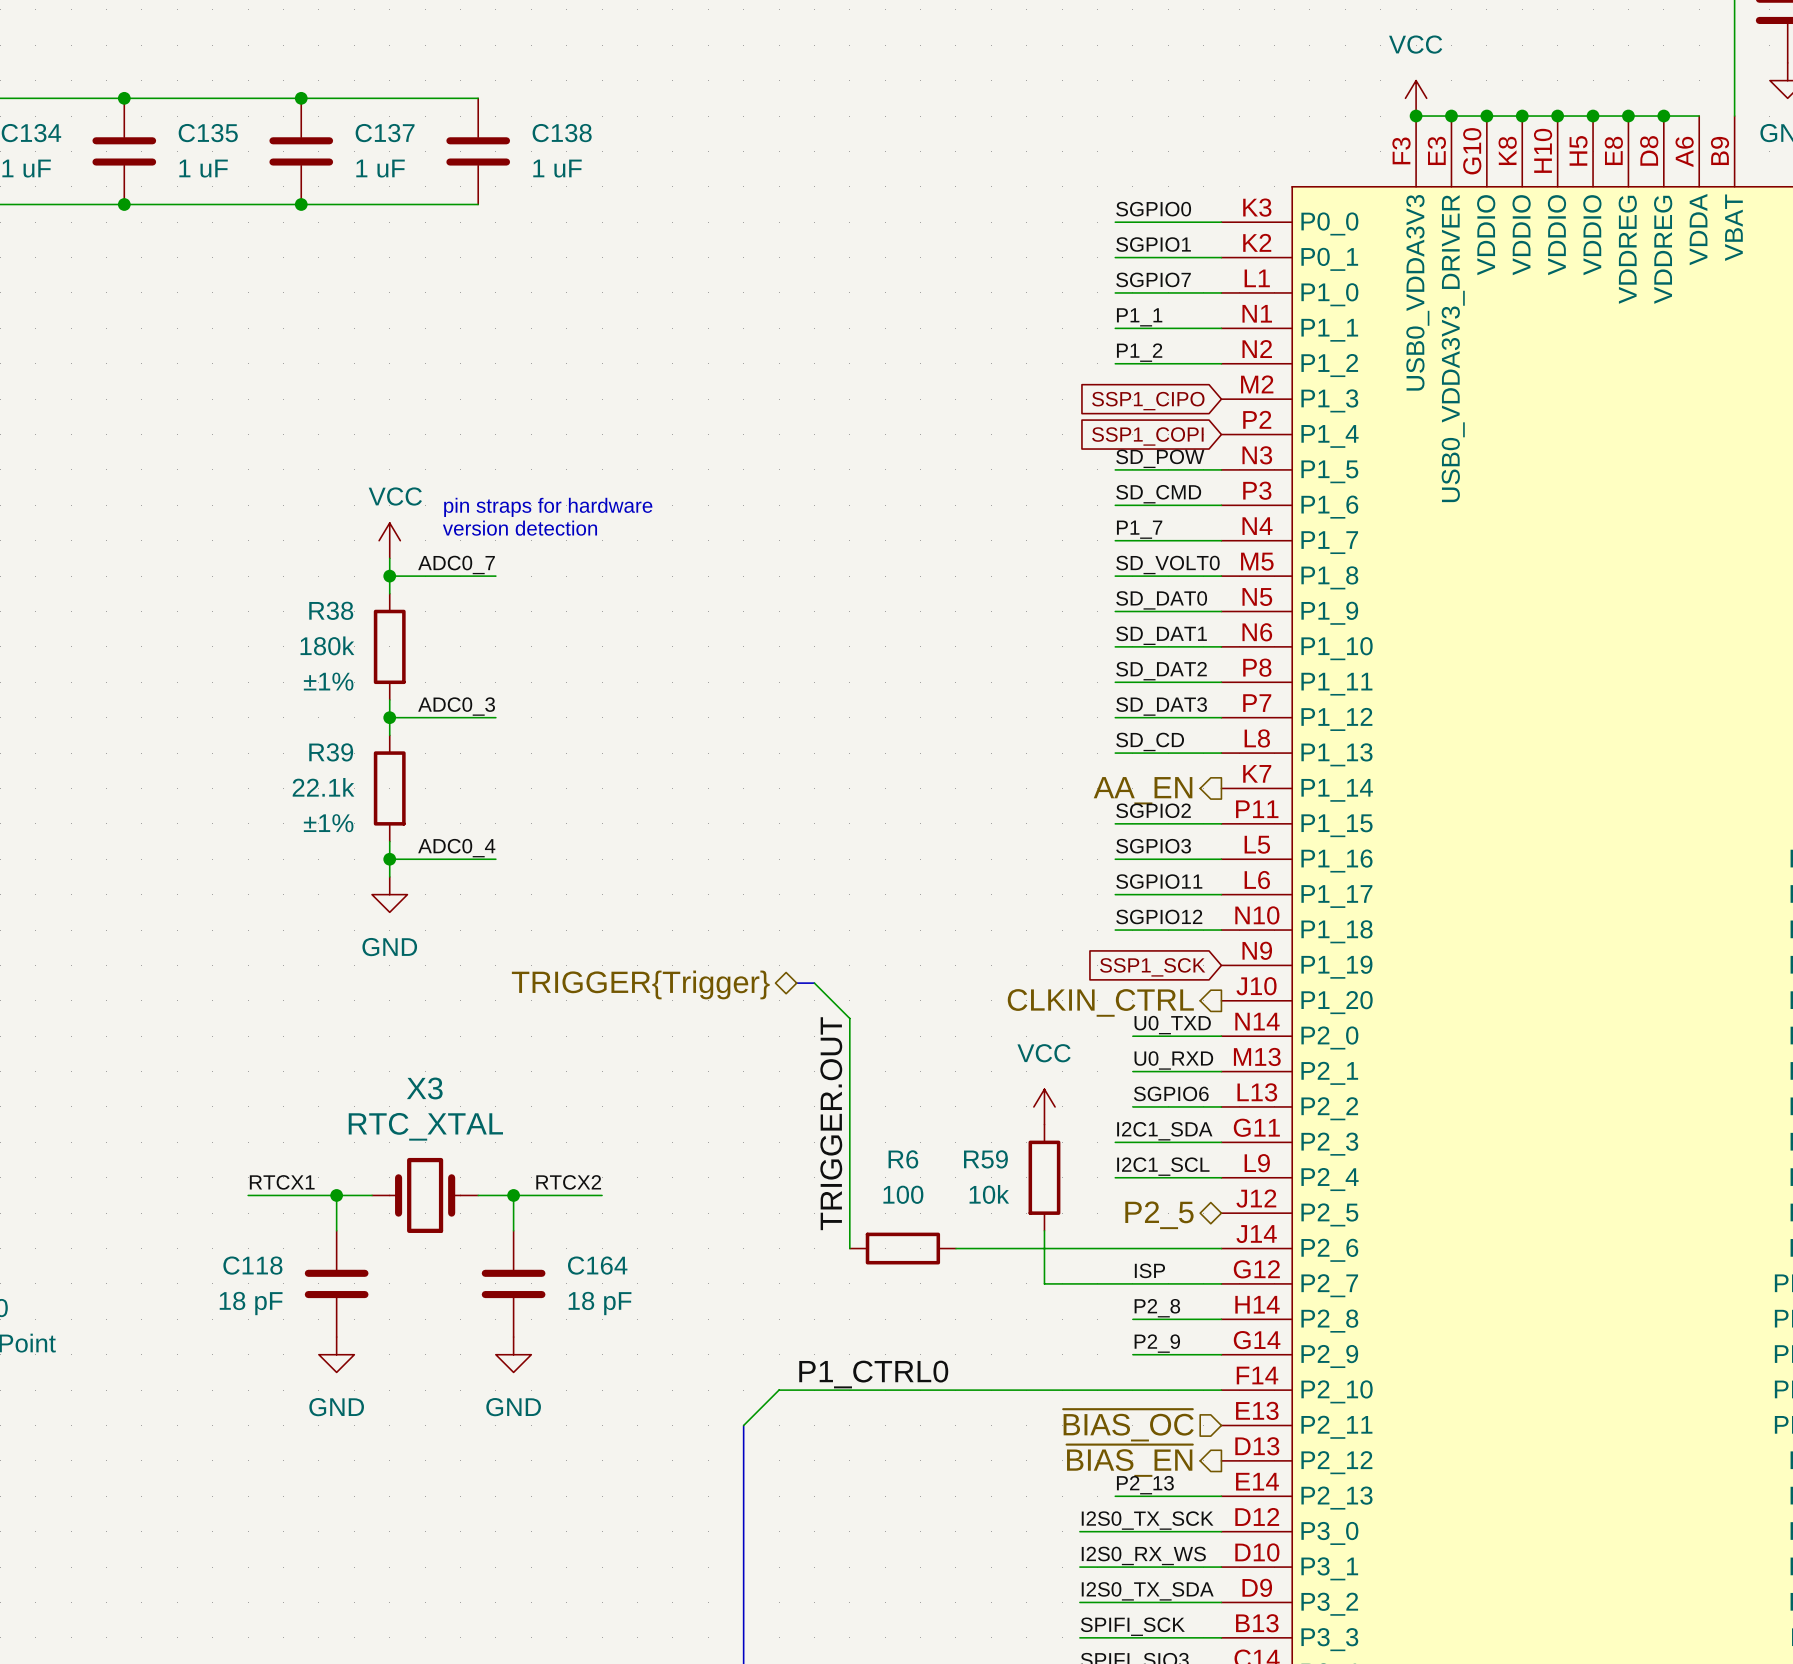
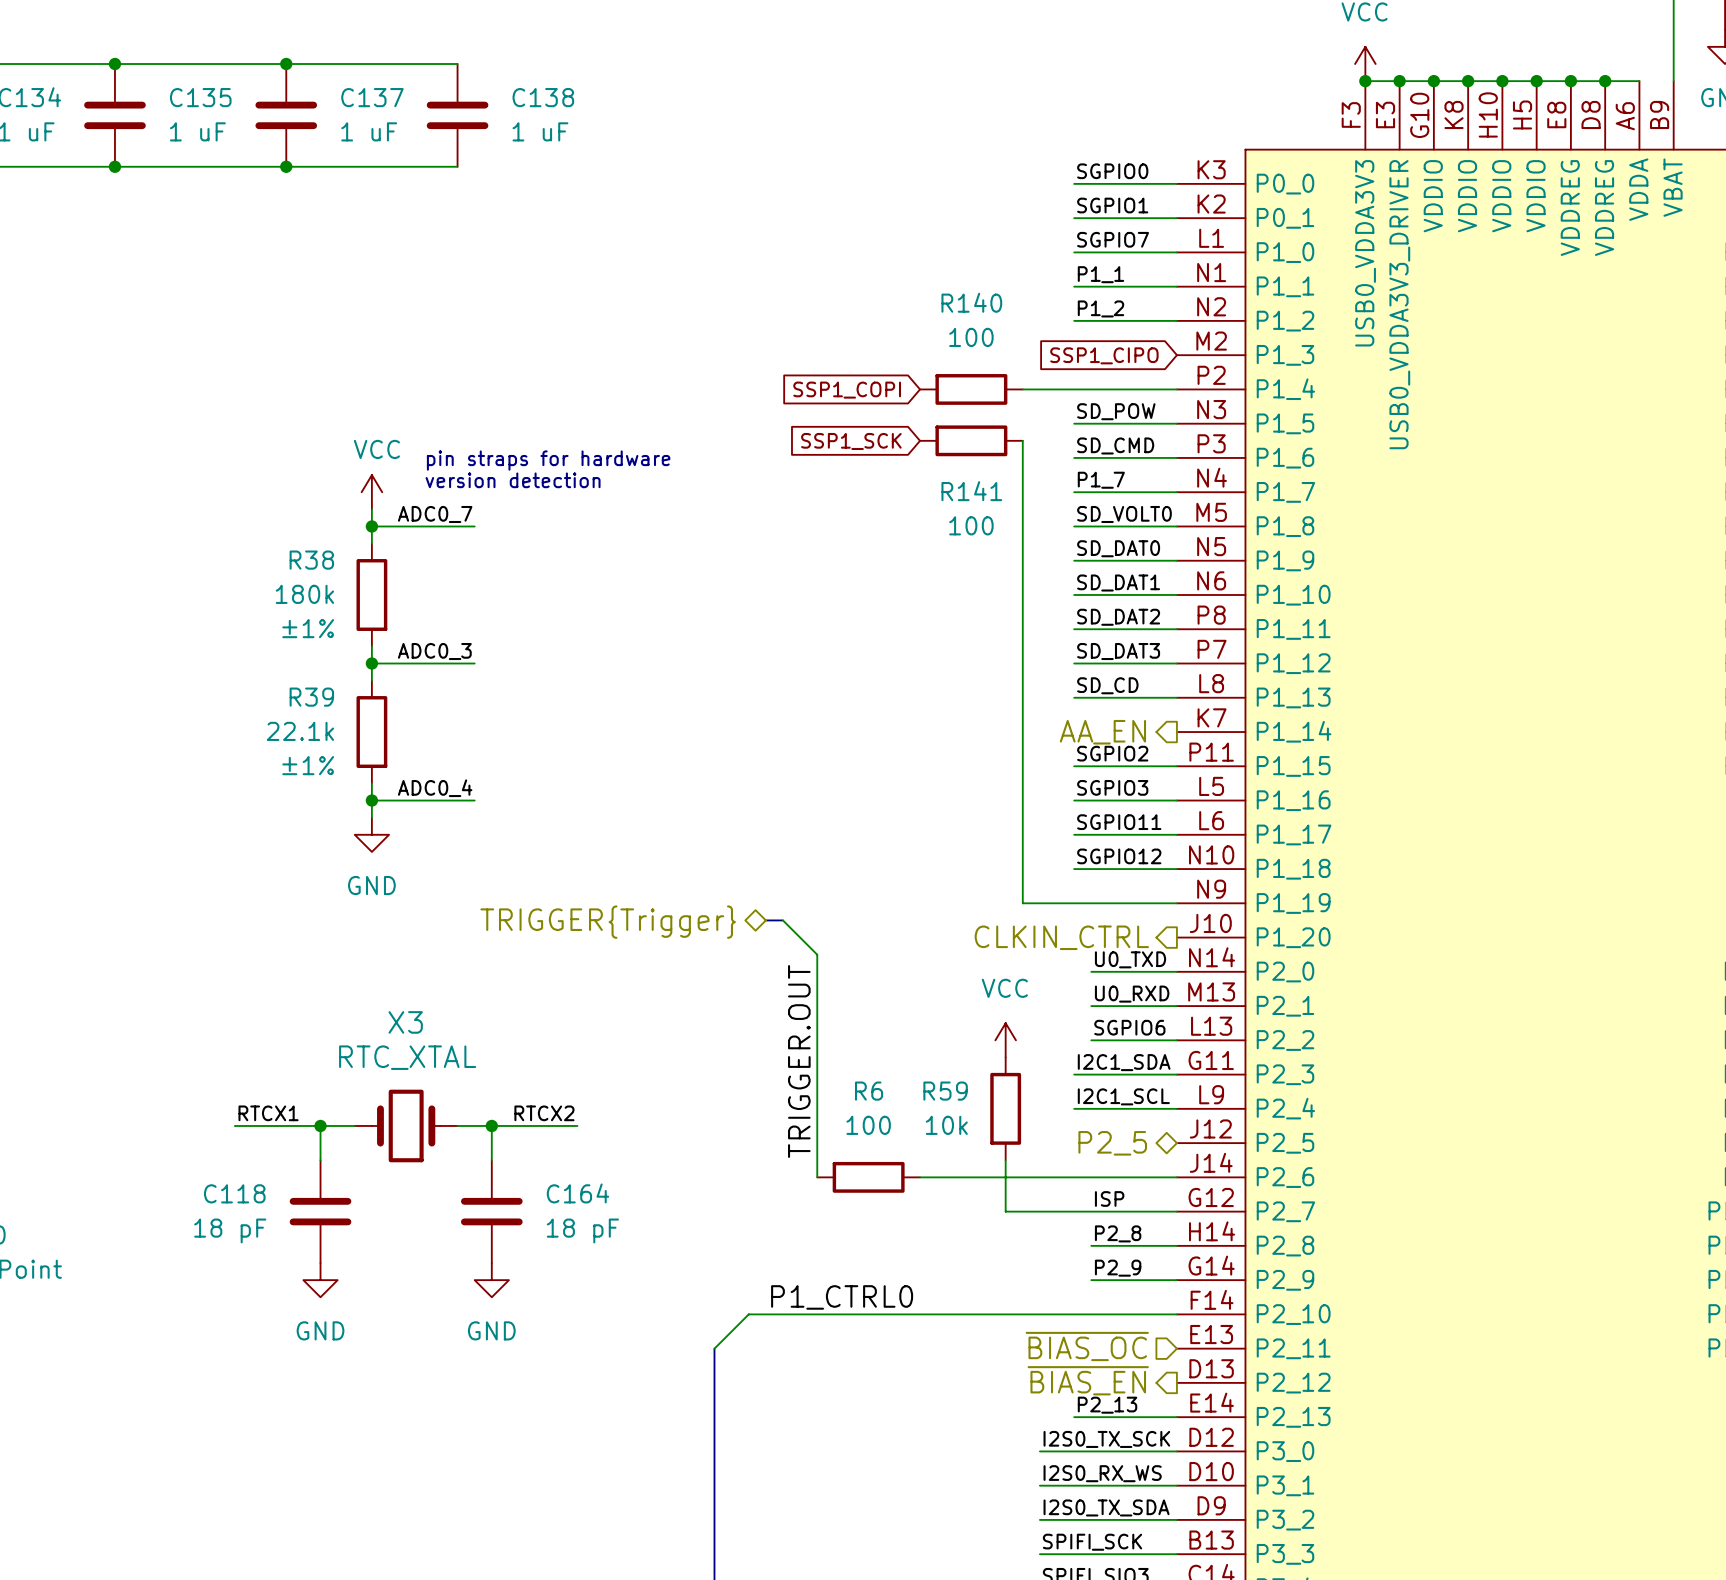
R140: none -> 100 (971, 389)
wire: none -> (1022, 389) (1176, 389)
global label position: SSP1_COPI (1147, 436) -> SSP1_COPI (847, 390)
R141: none -> 100 (971, 440)
wire: none -> (1022, 440) (1022, 903) (1176, 903)
global label: none -> SSP1_SCK (851, 441)
global label: SSP1_SCK (1152, 967) -> none

